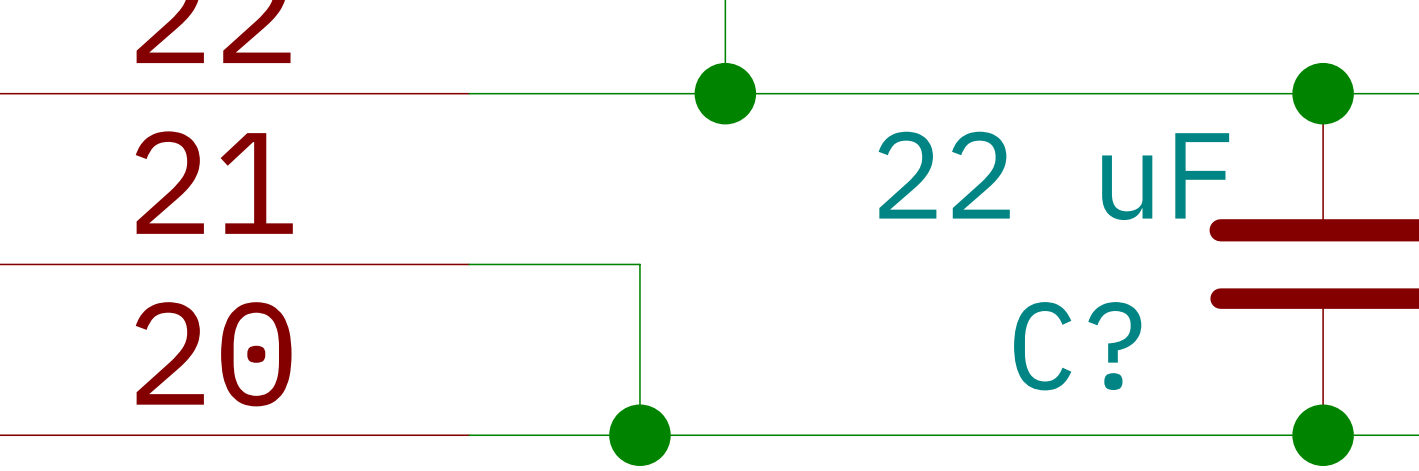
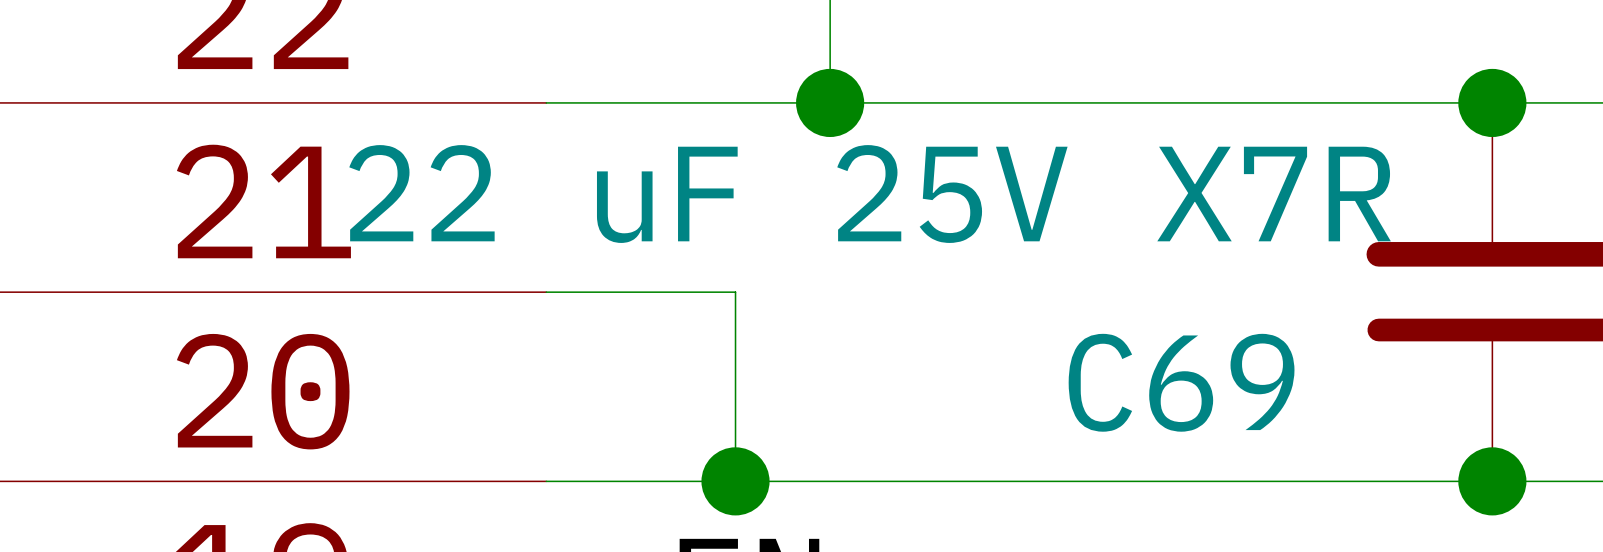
C? value: 22 uF (1053, 175) -> 22 uF 25V X7R (870, 194)
C? name: C? (1077, 346) -> C69 (1181, 382)

